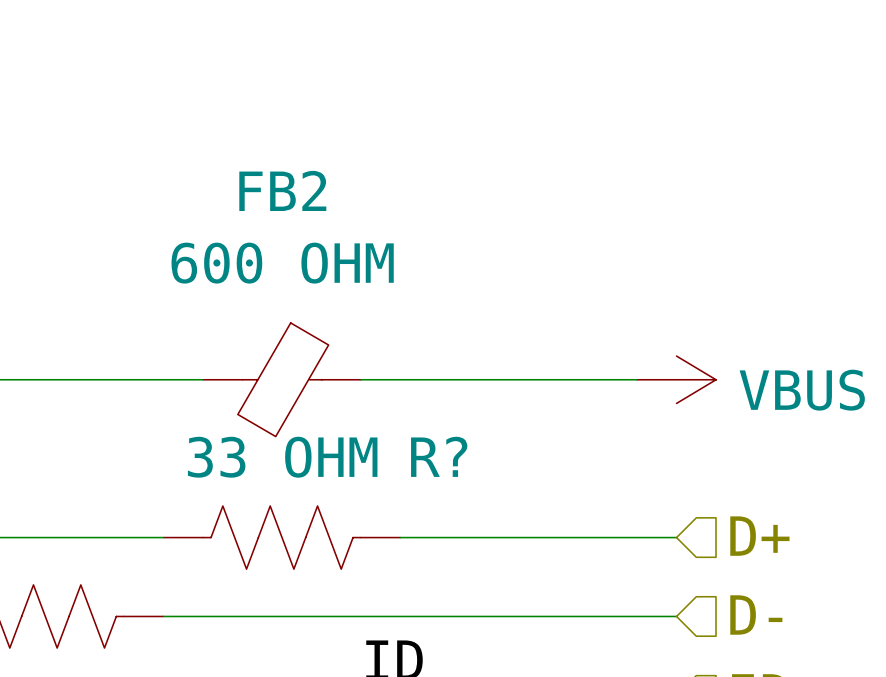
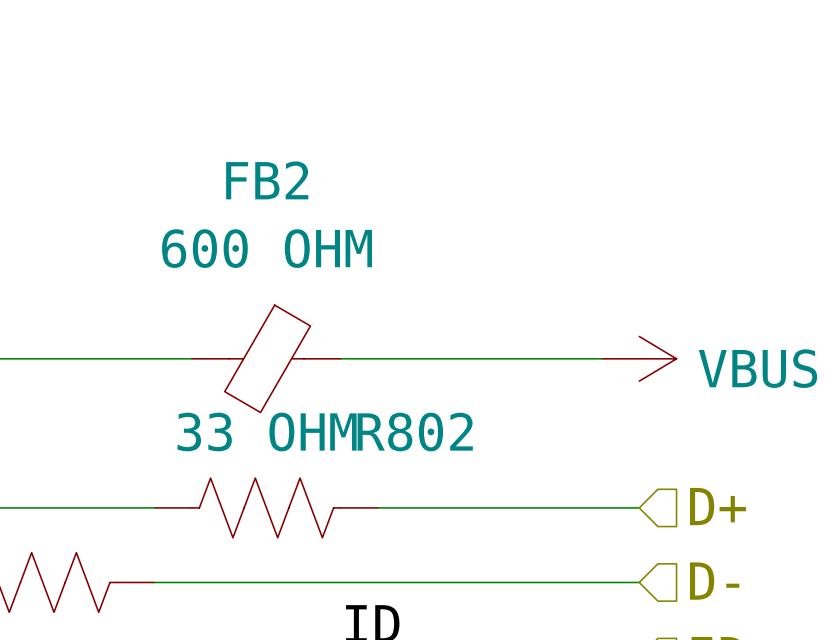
R? name: R? (439, 456) -> R802 (415, 432)

